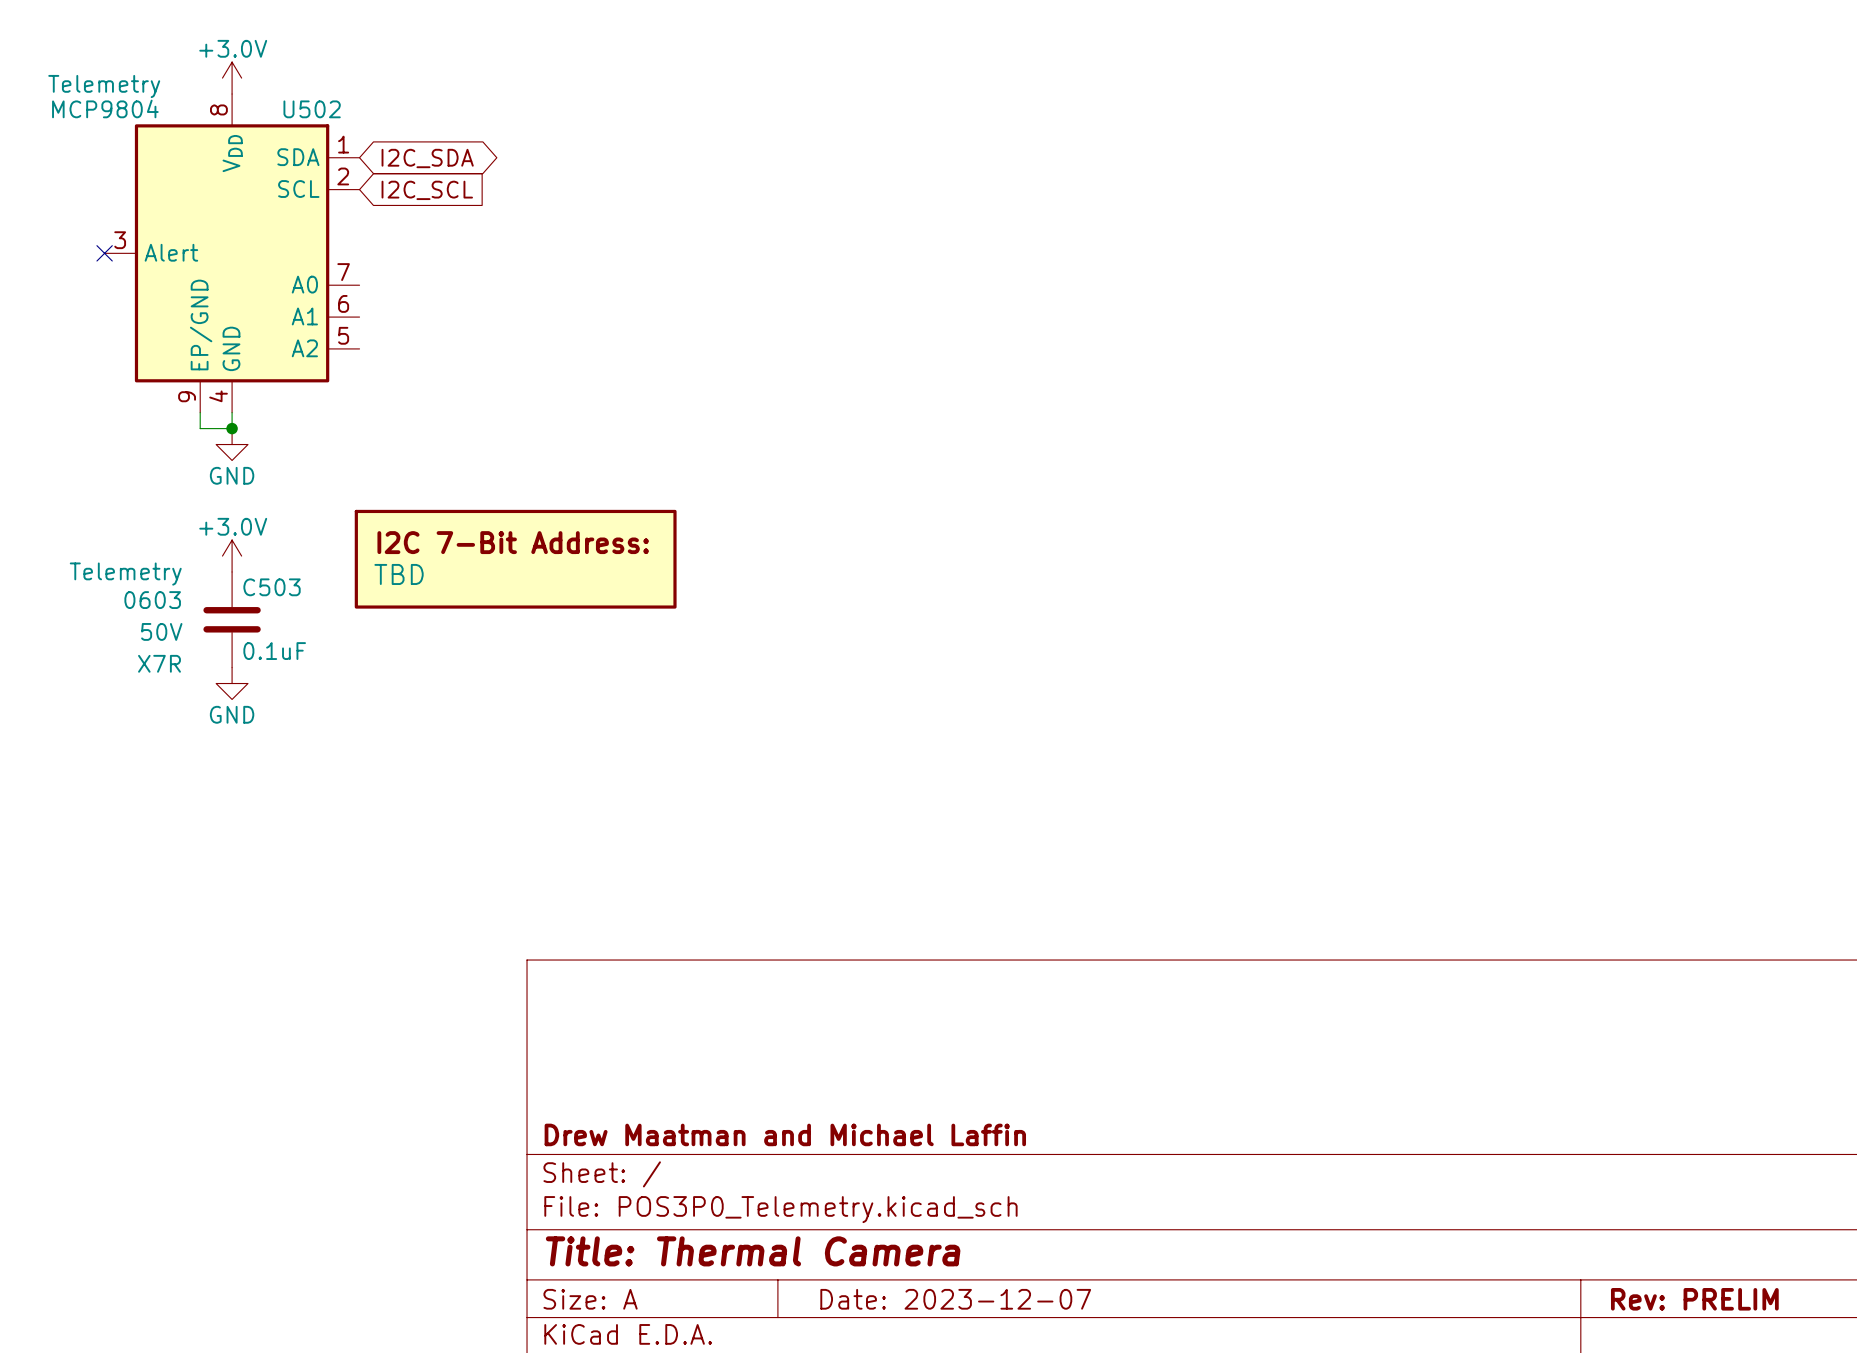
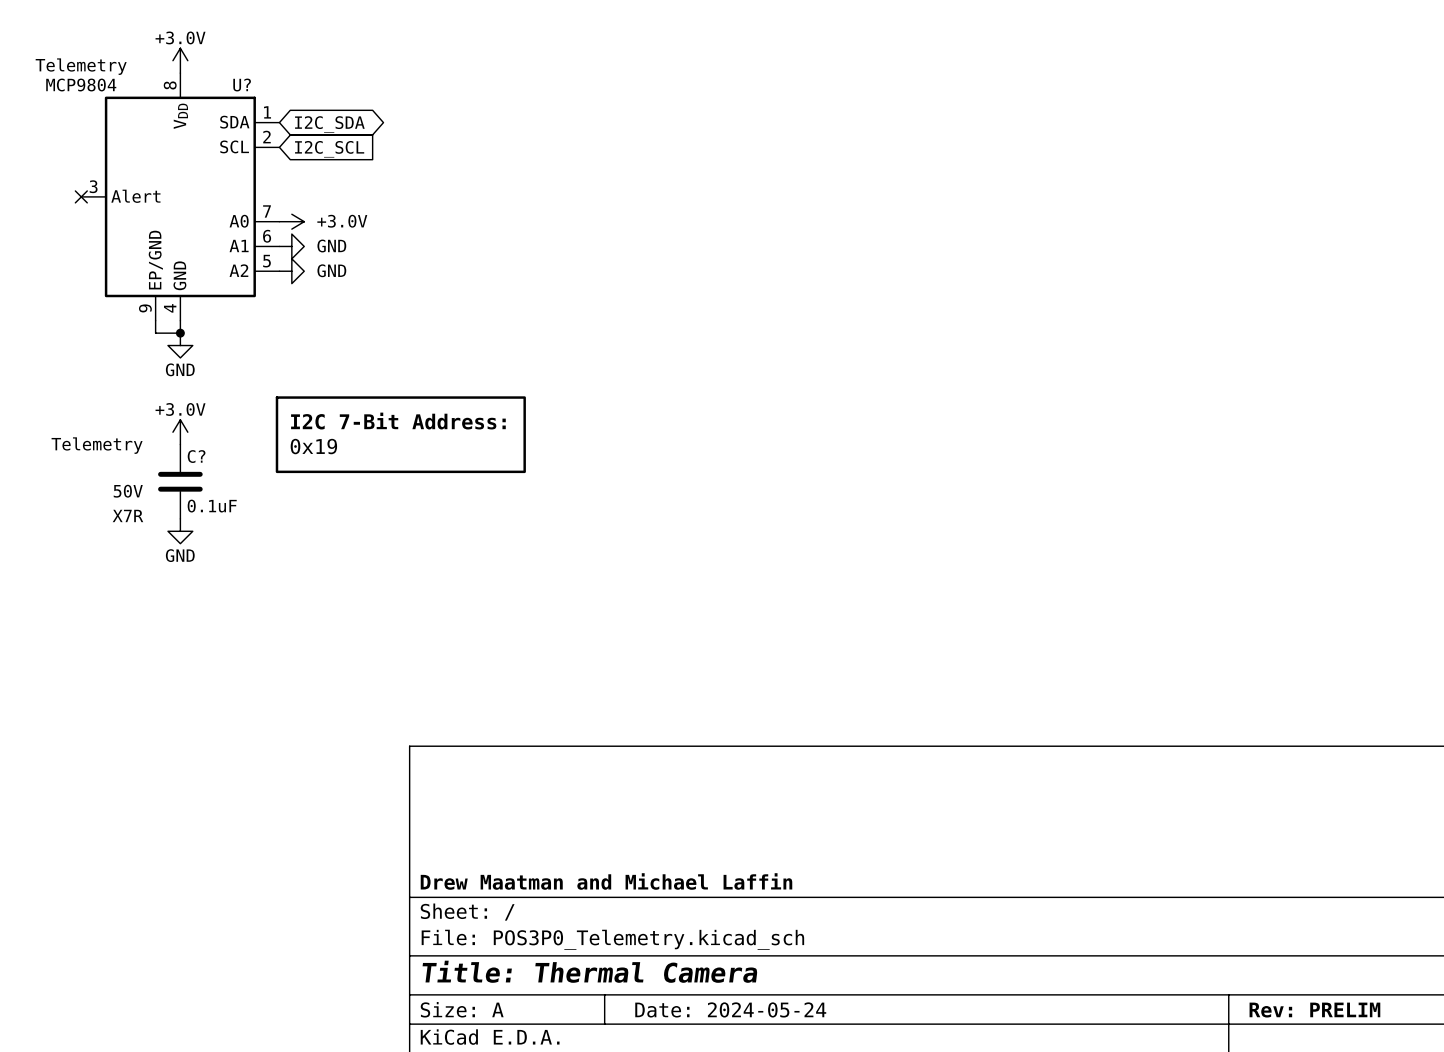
U502 name: U502 (312, 109) -> U? (242, 85)
power symbol: none -> +3.0V (291, 221)
power symbol: none -> GND (291, 246)
power symbol: none -> GND (291, 271)
part value: TBD (399, 574) -> 0x19 (313, 446)
C503 name: C503 (272, 587) -> C? (196, 456)
C503 text: 0603 (152, 600) -> none
title block: Date: 2023-12-07 (955, 1299) -> Date: 2024-05-24 (730, 1009)

